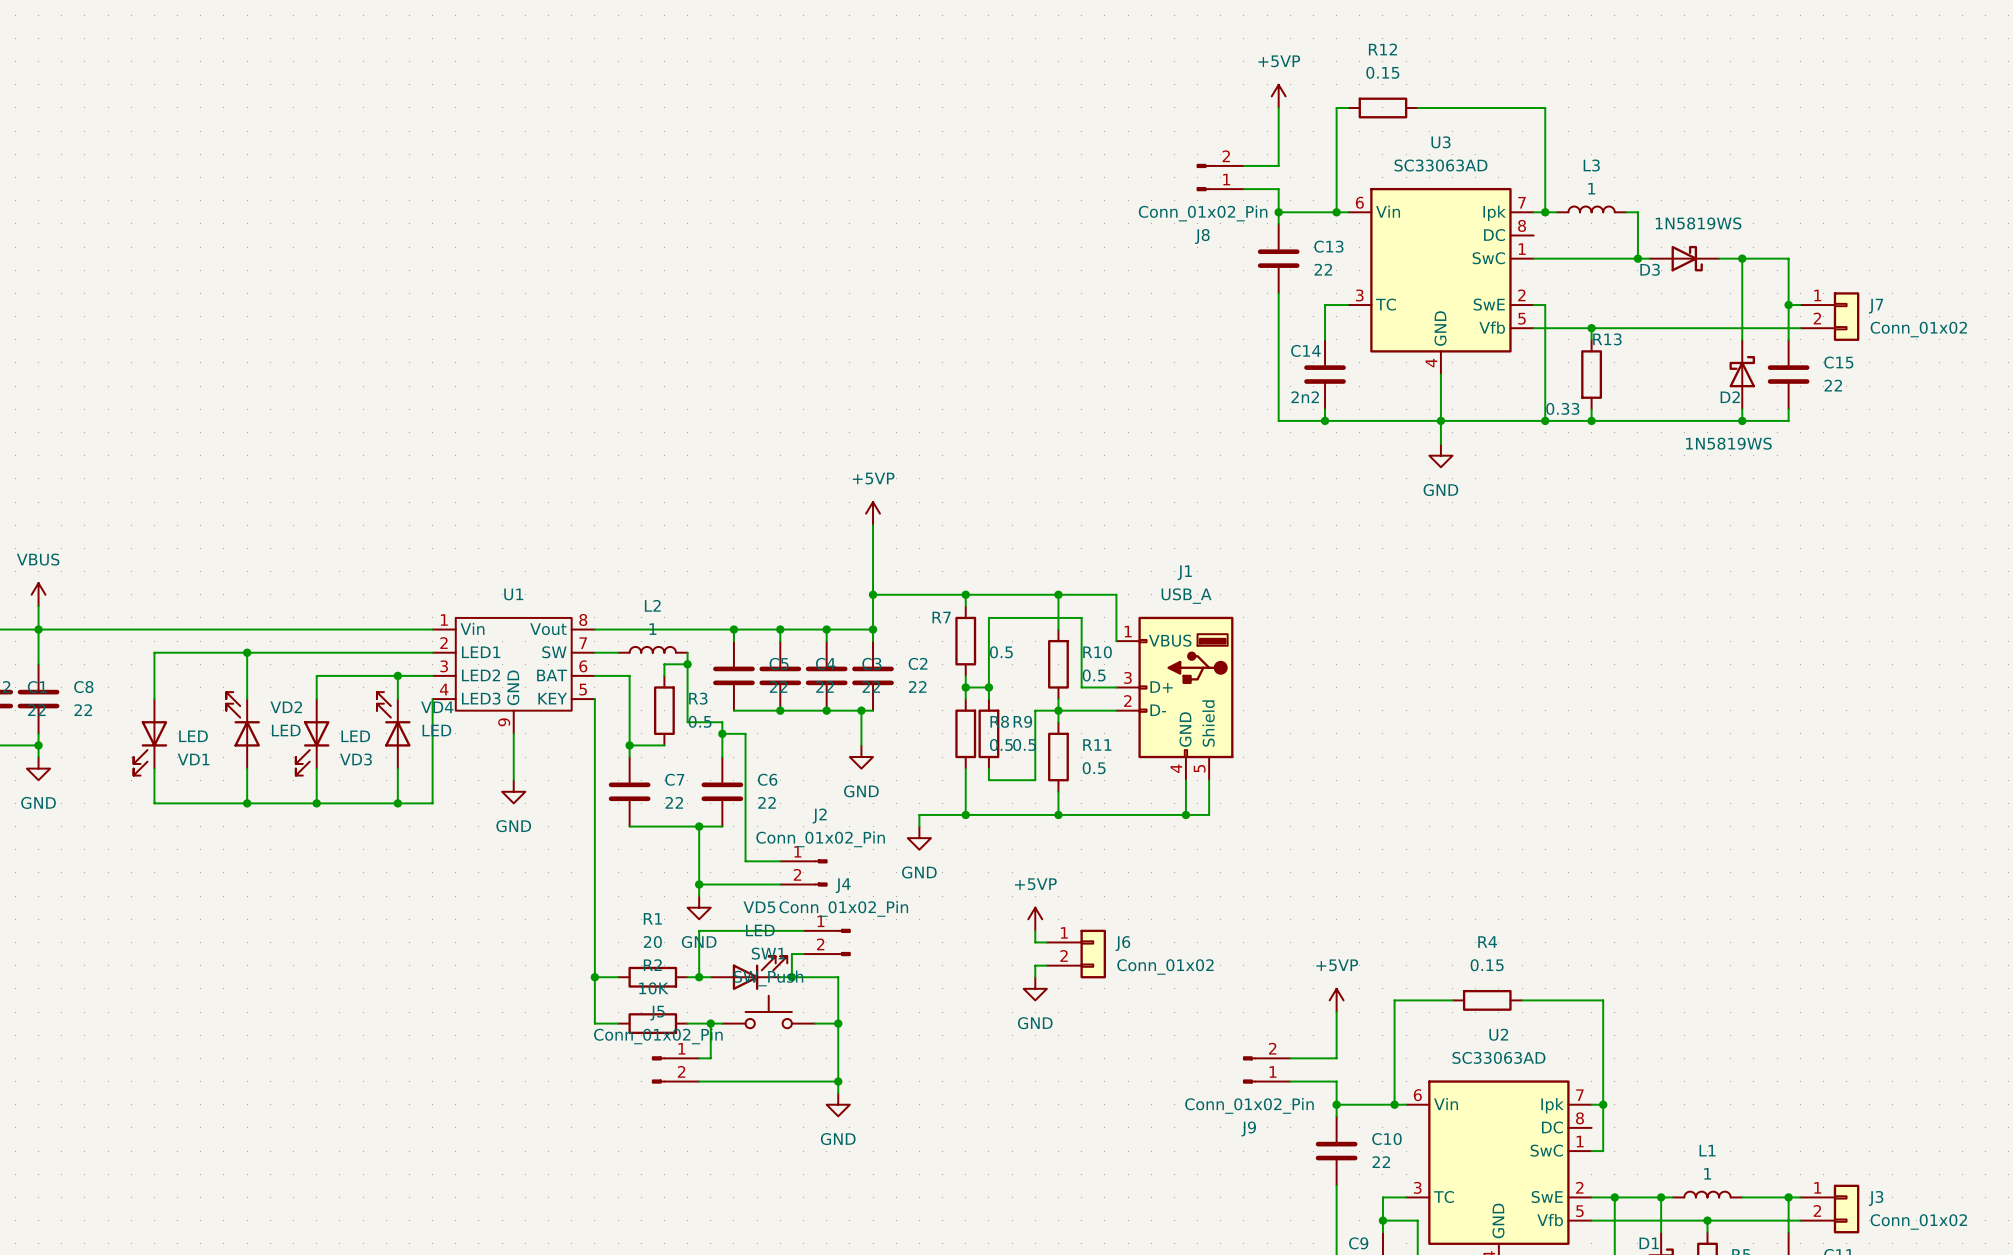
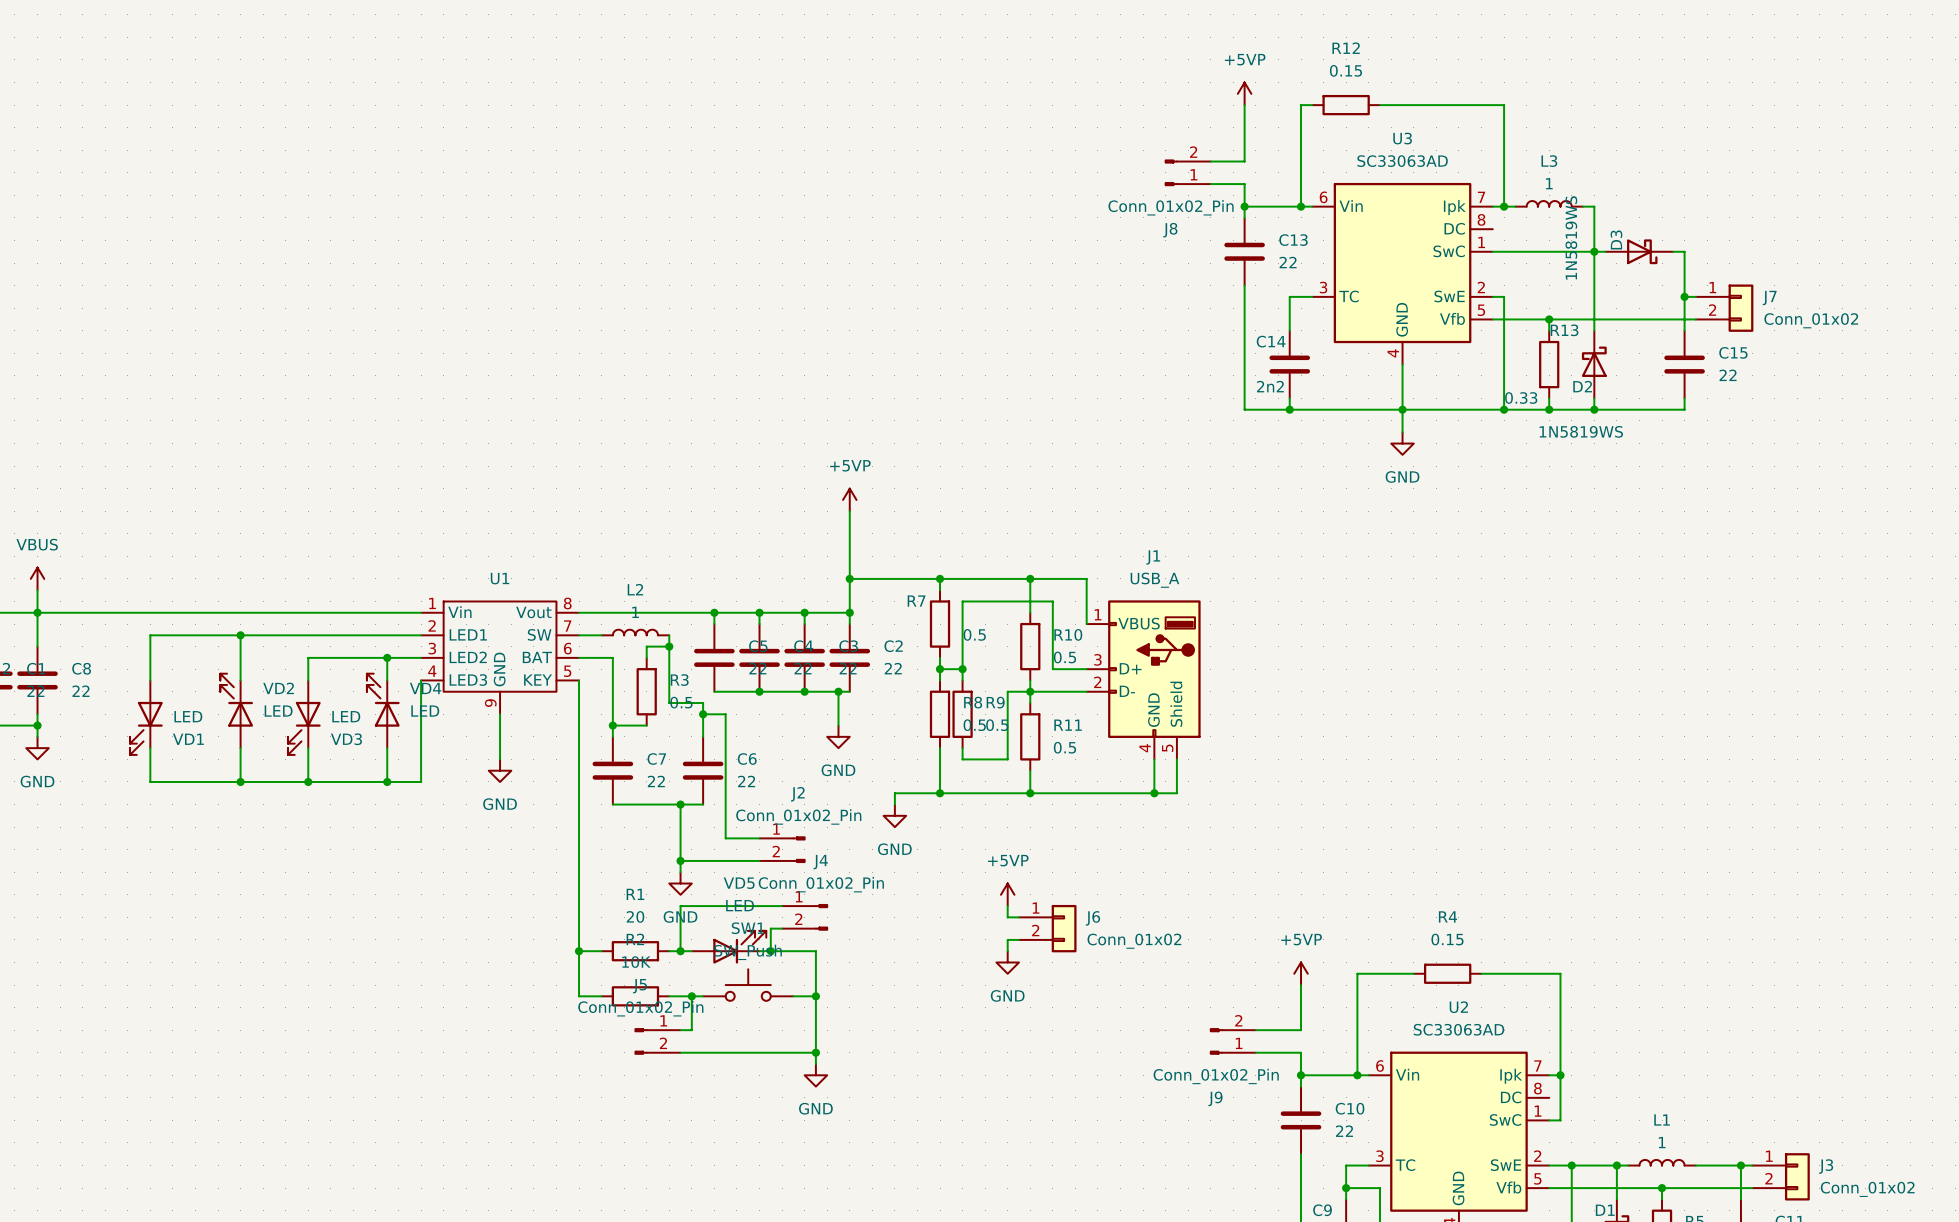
D3 value rotation: 0° (1698, 223) -> 90° counterclockwise (1571, 237)
wire: (1730, 258) (1788, 258) (1788, 339) -> (1684, 251) (1684, 330)
wire: (1742, 258) (1742, 339) -> (1594, 251) (1594, 330)
junction: (1742, 258) -> none
D3 name rotation: 0° (1650, 269) -> 90° counterclockwise (1616, 239)
junction: none -> (1684, 296)
junction: (1788, 305) -> none
J7 position: (1829, 316) -> (1724, 308)
D2 position: (1742, 374) -> (1594, 364)
C15 position: (1788, 374) -> (1684, 364)
wire: (1742, 409) (1742, 420) -> (1594, 398) (1594, 409)
wire: (1788, 409) (1788, 420) (1730, 420) -> (1684, 398) (1684, 409)
junction: none -> (1594, 409)
junction: (1742, 420) -> none

